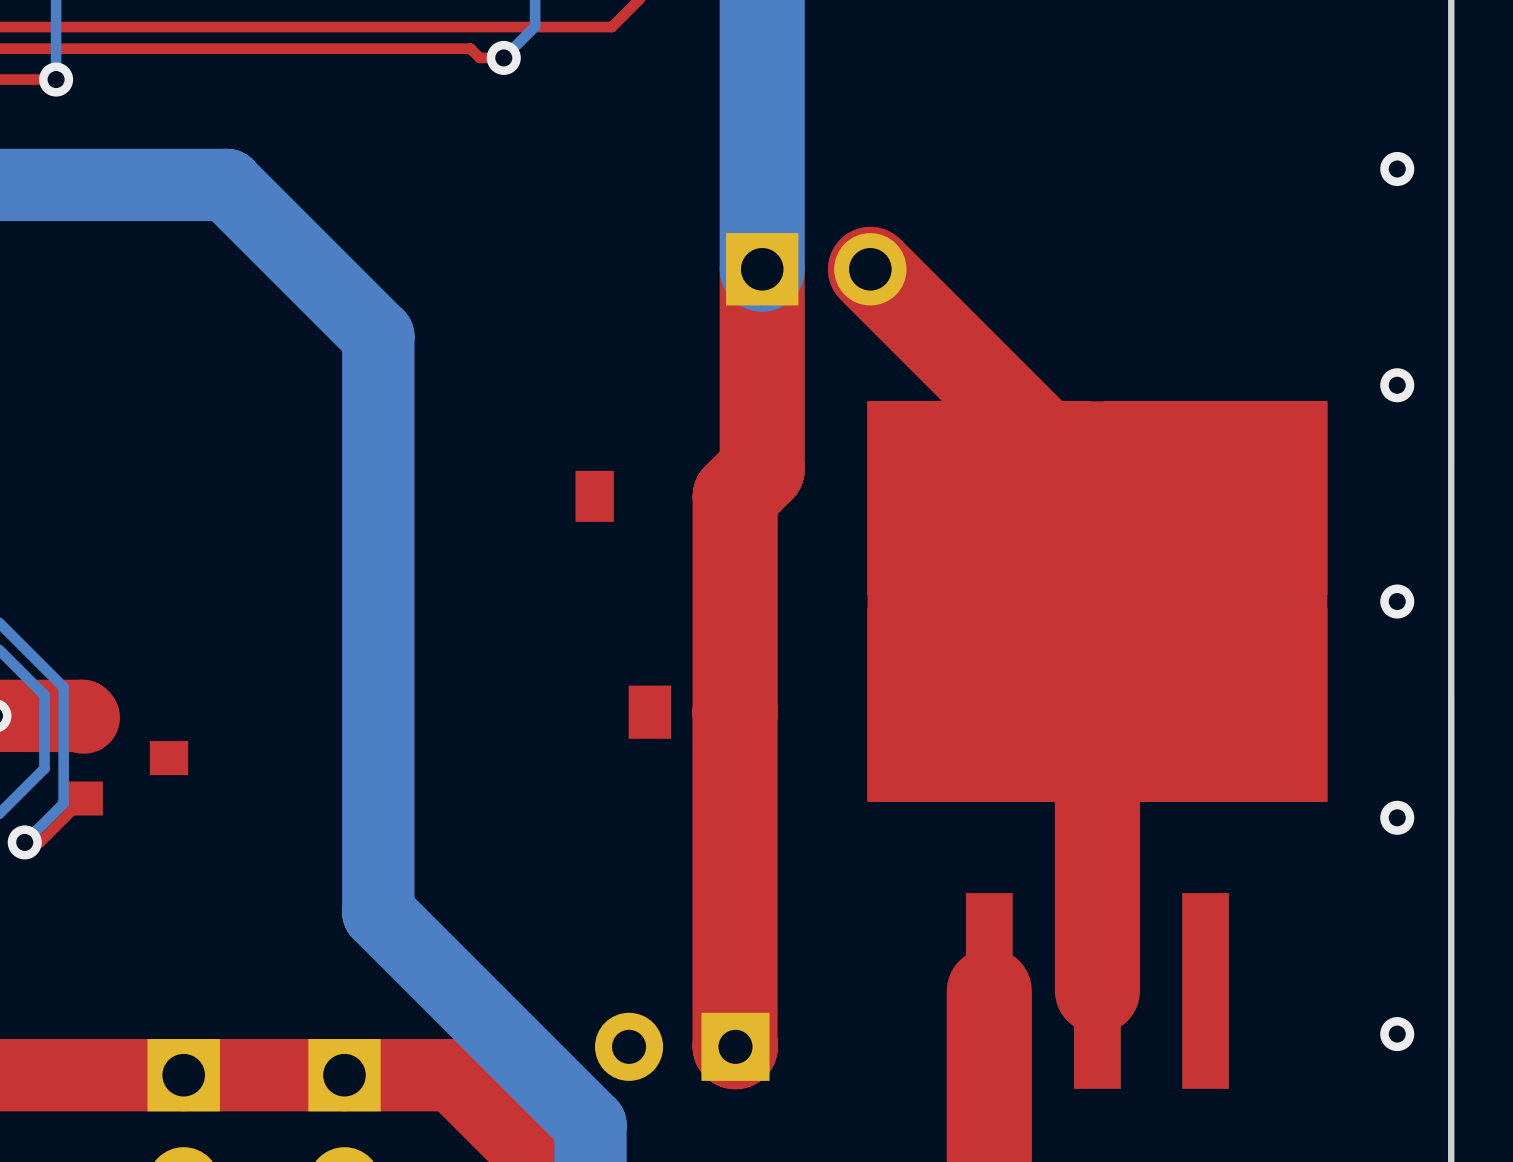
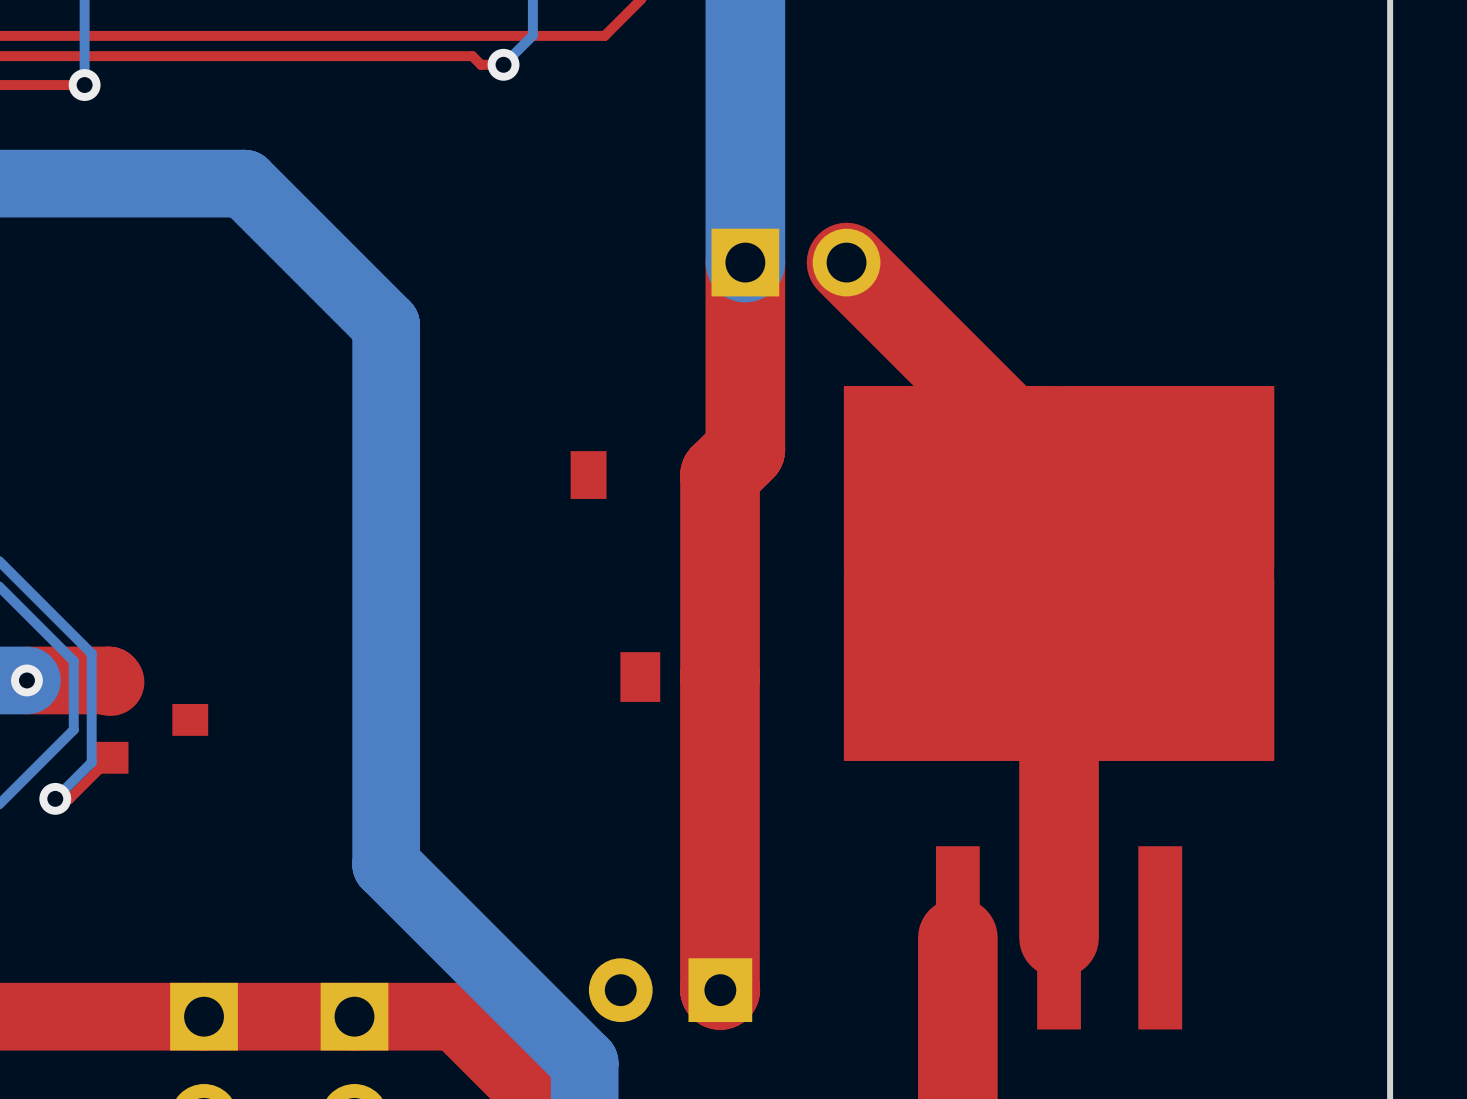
via: (1397, 168) -> none
via: (1397, 385) -> none
via: (1397, 601) -> none
via: (1397, 817) -> none
via: (1397, 1034) -> none

